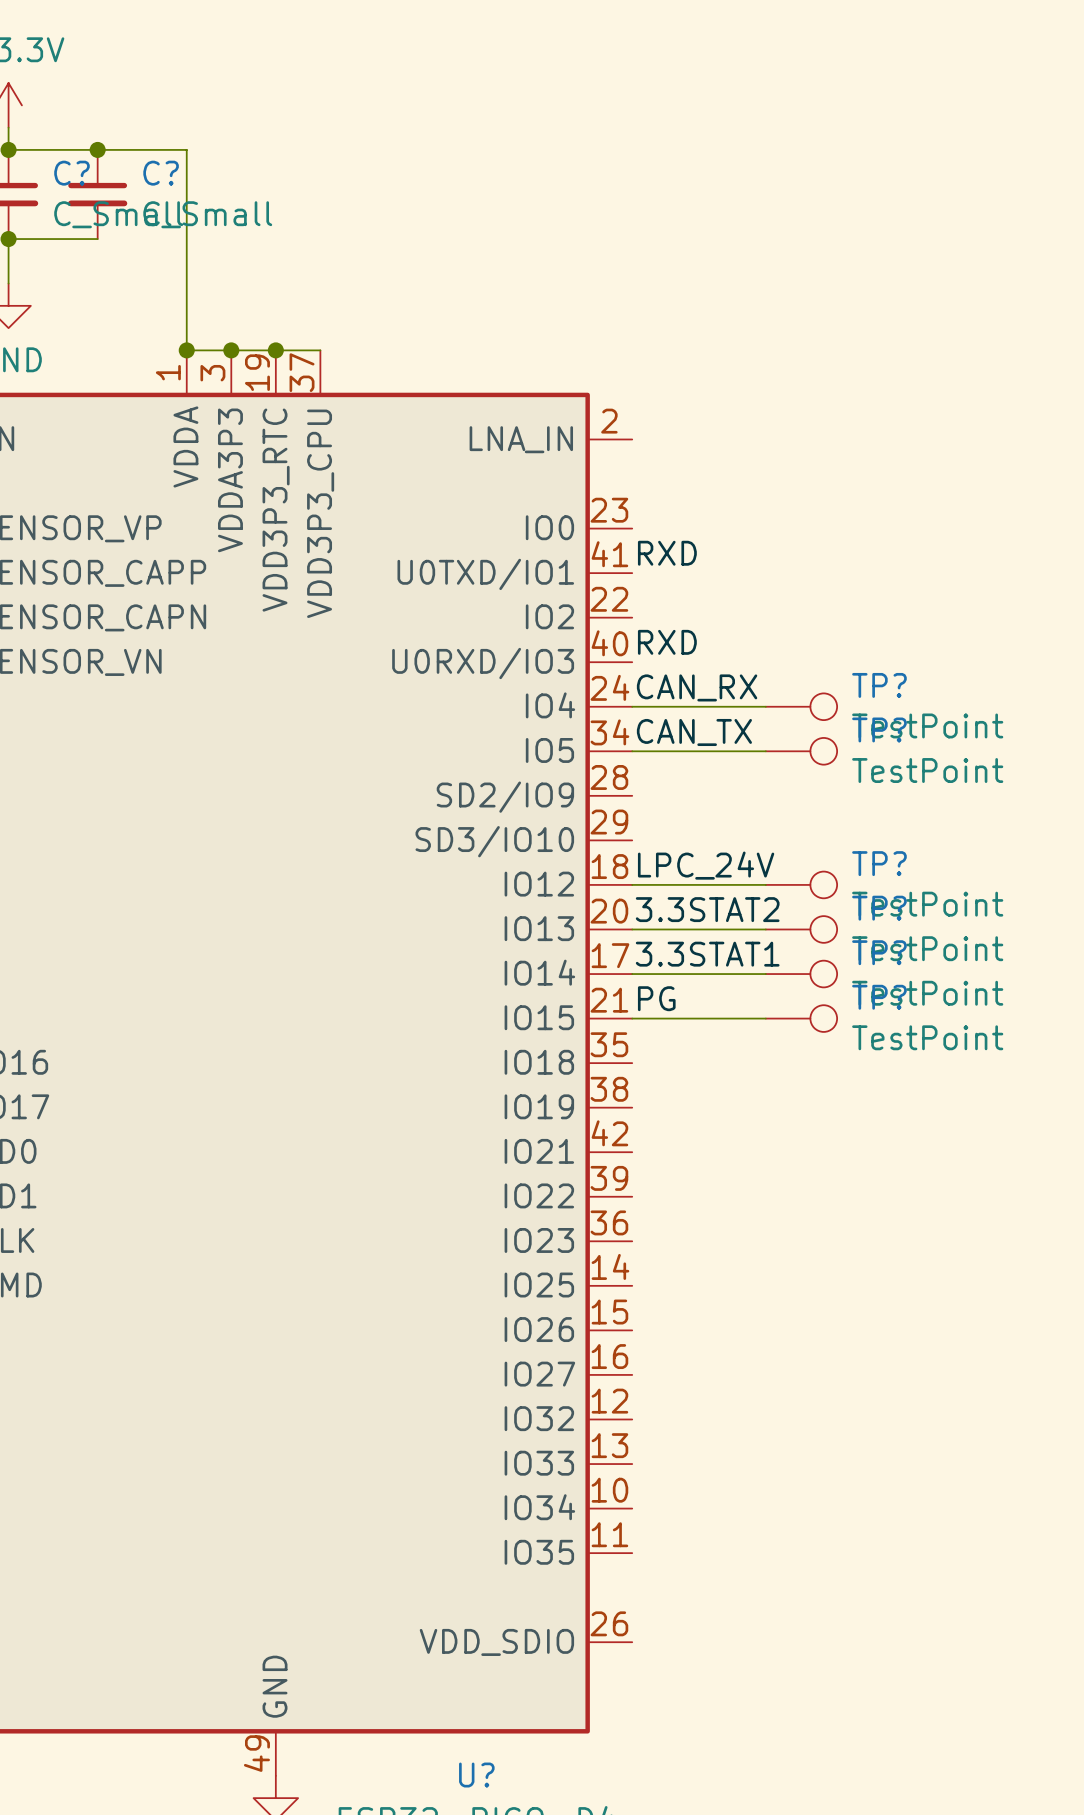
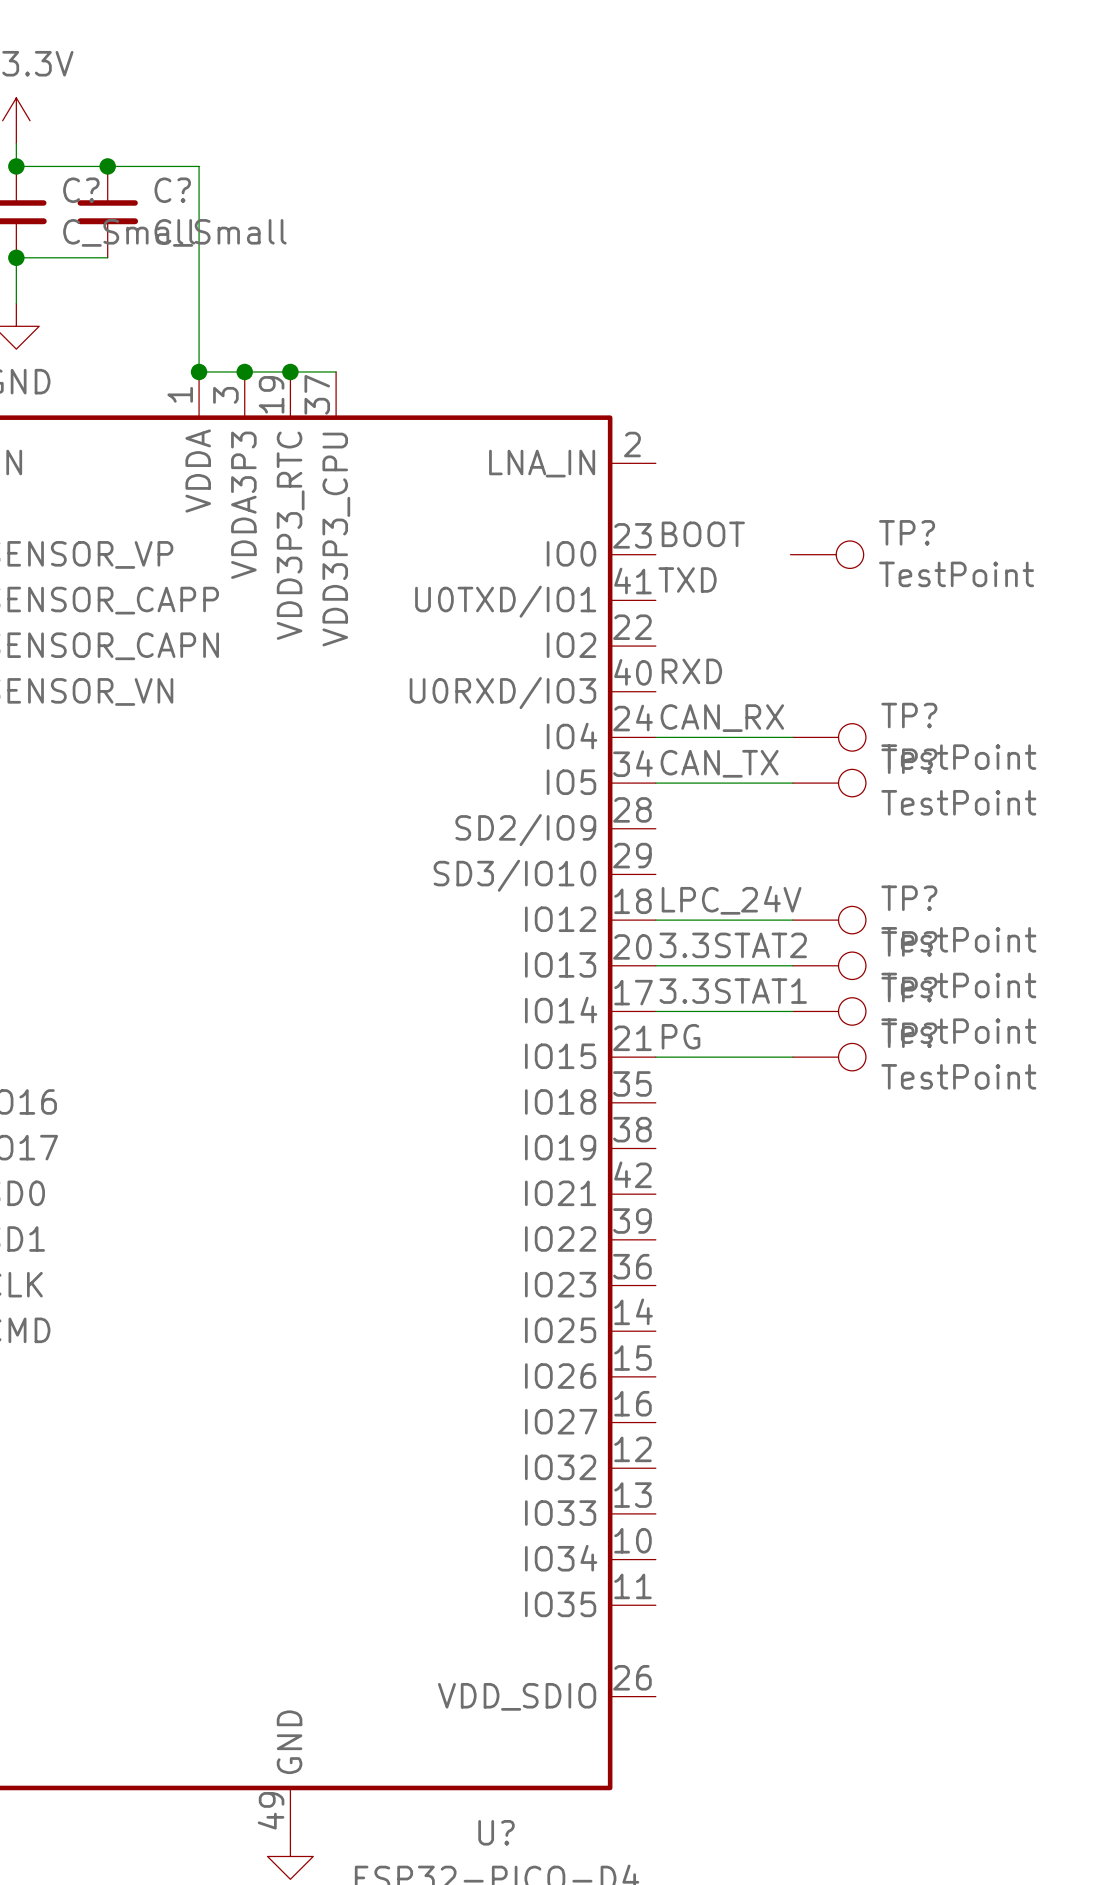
label: none -> BOOT (703, 534)
TP?: none -> TestPoint (827, 554)
label: RXD (667, 553) -> TXD (687, 579)

